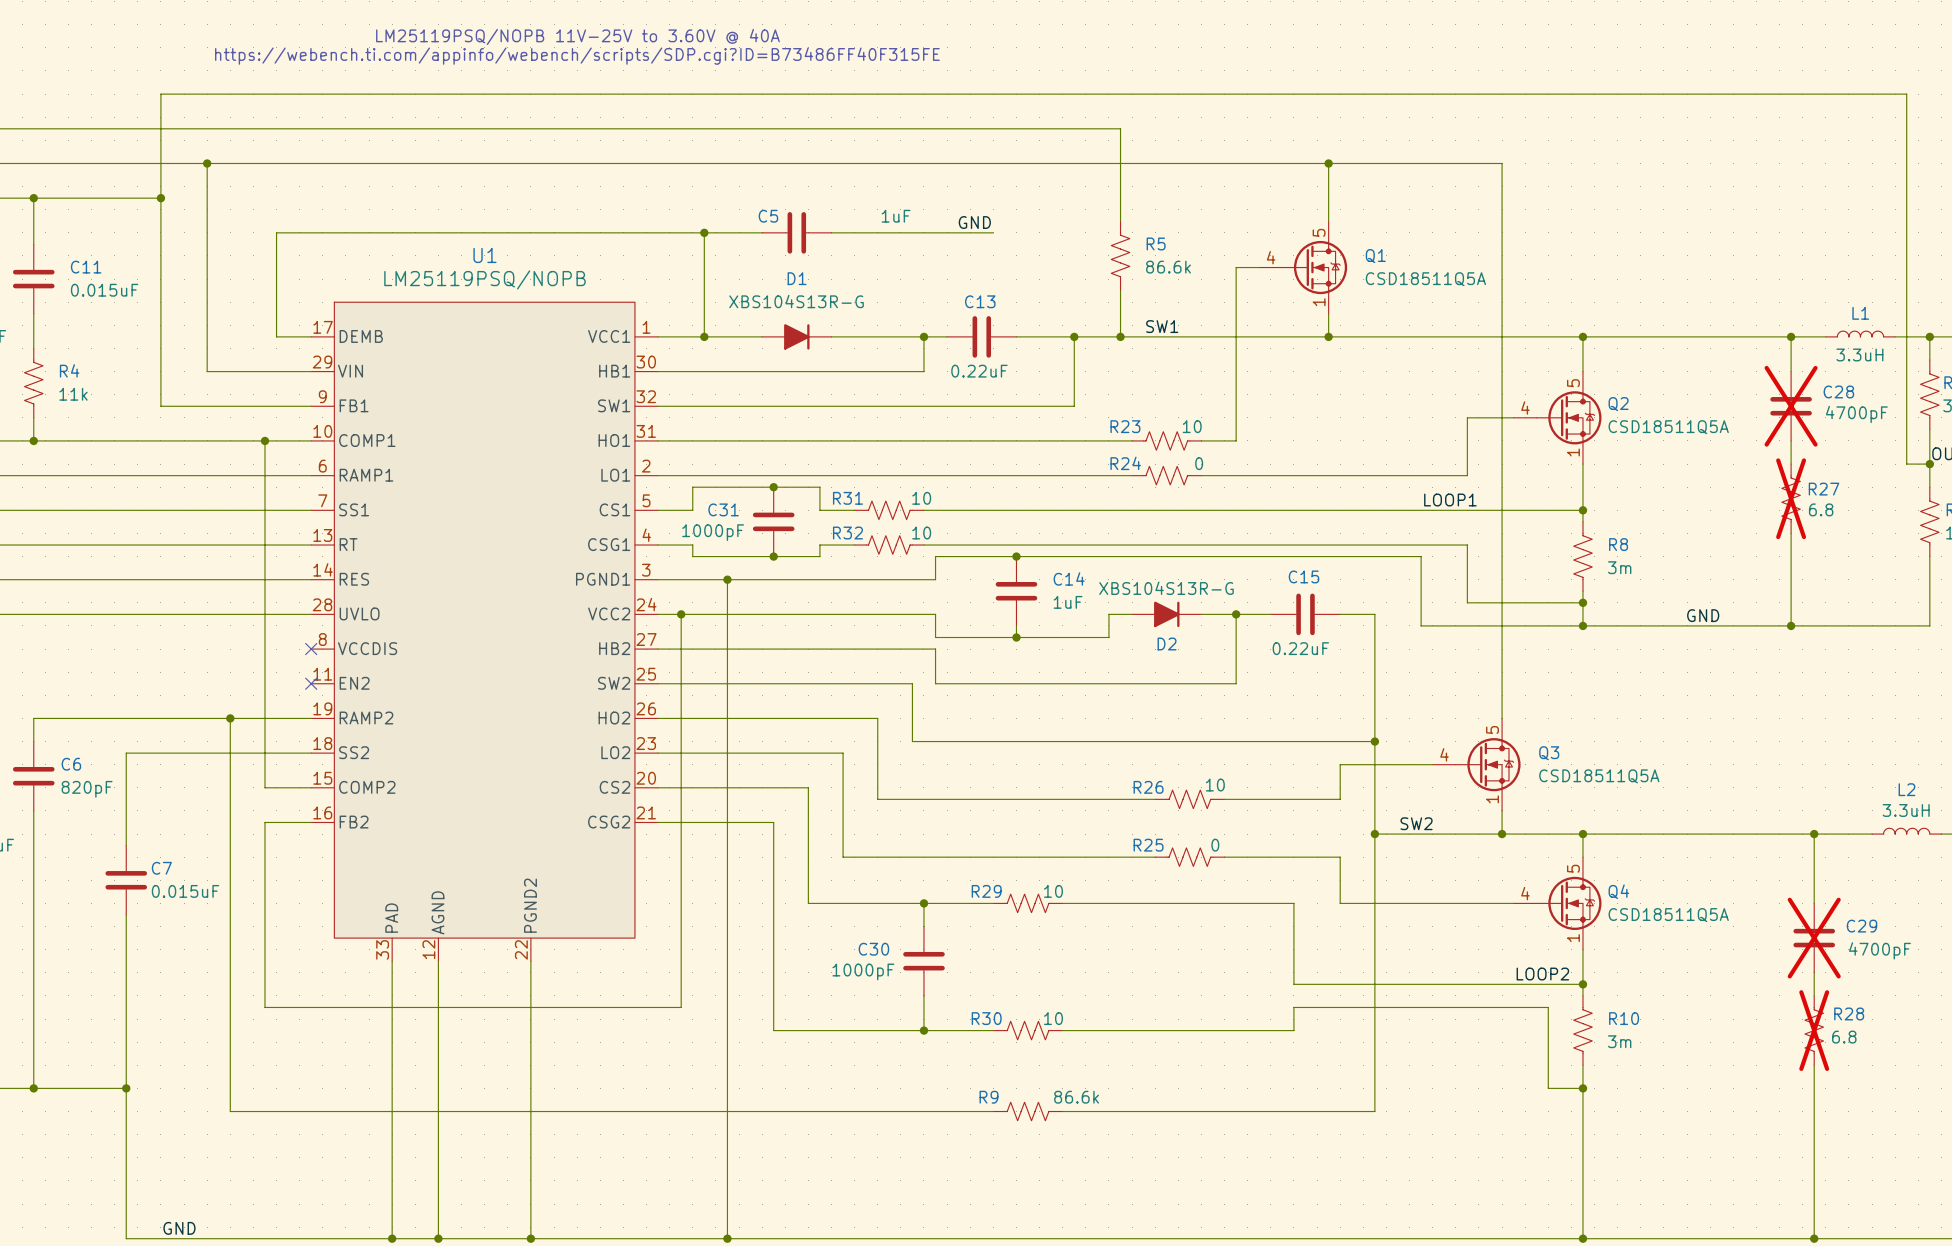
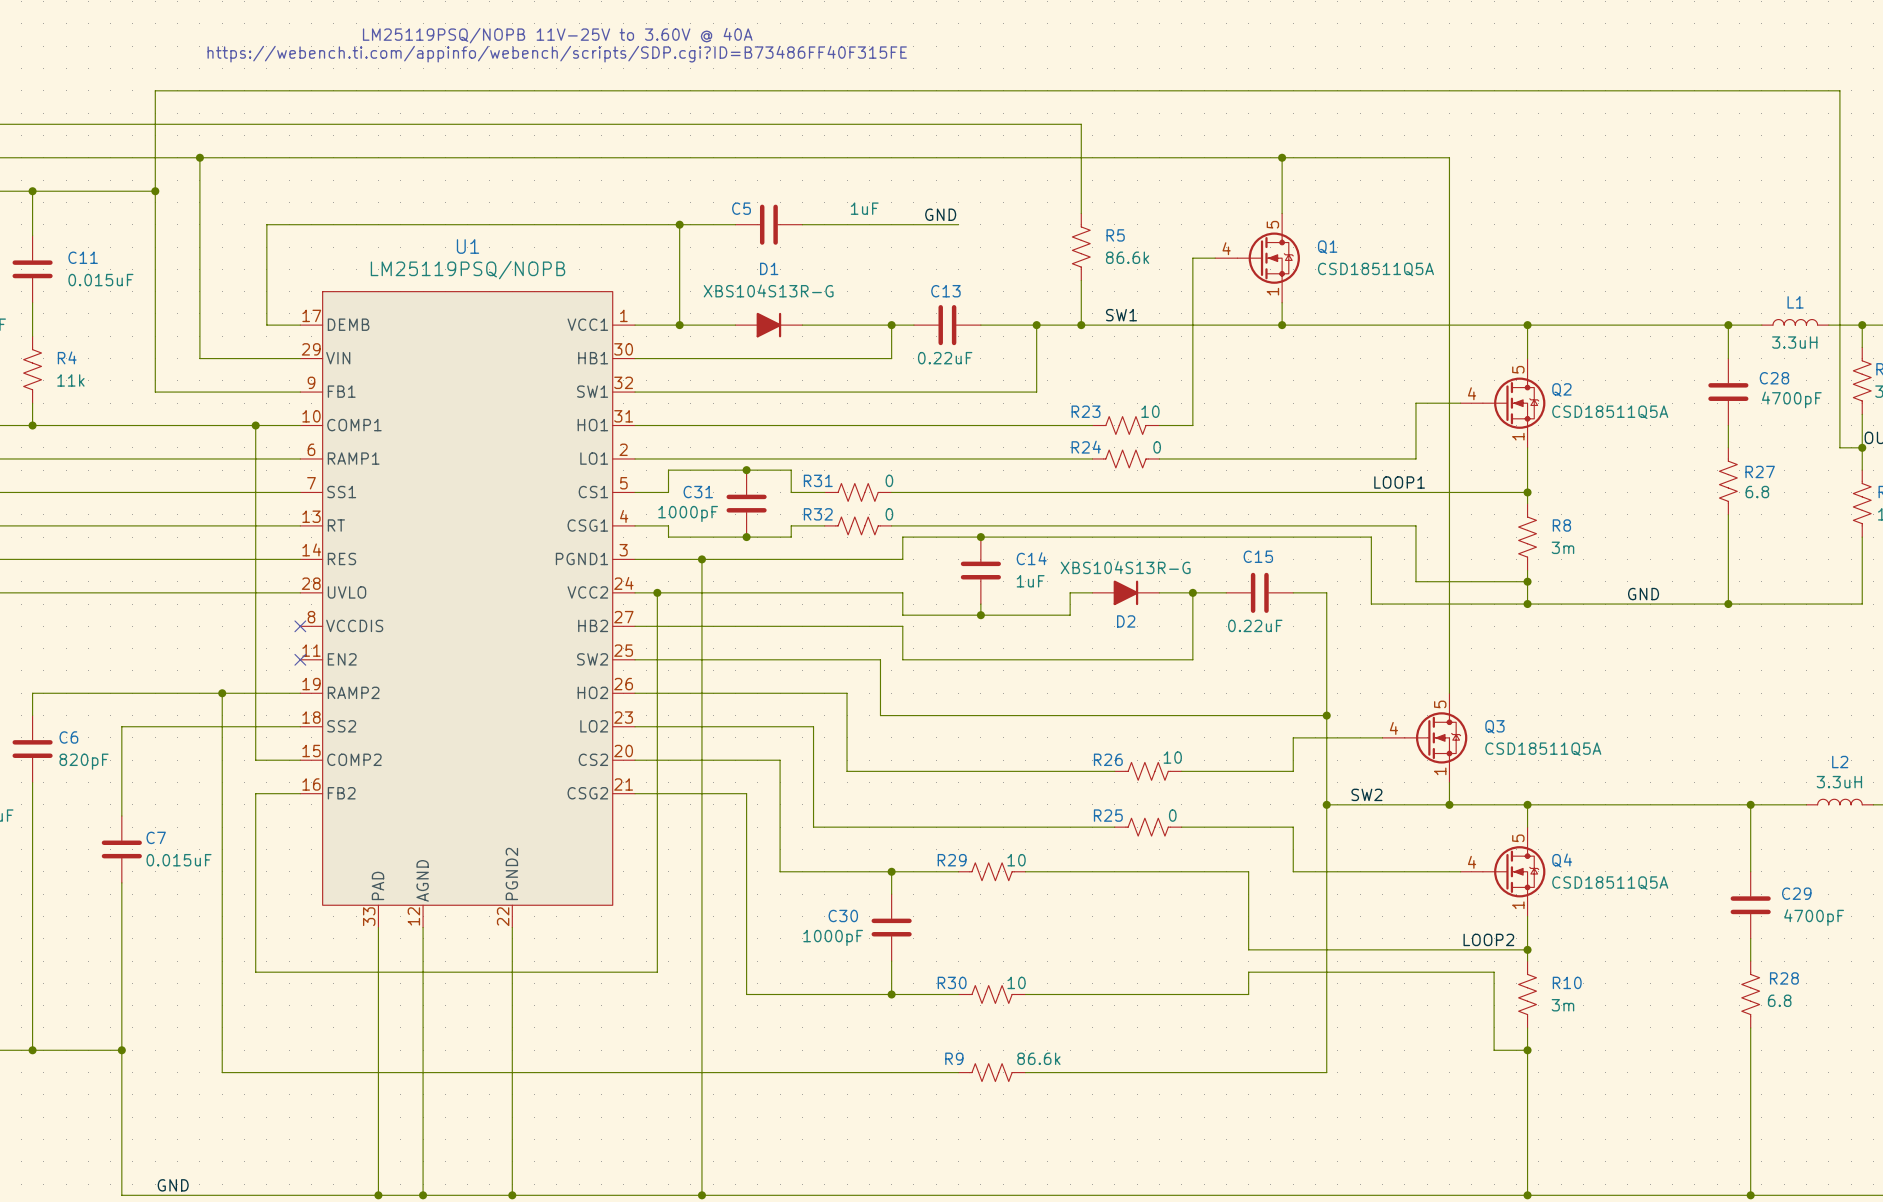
C28 do-not-place cross: (1791, 406) -> none
R31 value: 10 (921, 498) -> 0 (889, 480)
R27 do-not-place cross: (1791, 498) -> none
R32 value: 10 (921, 533) -> 0 (889, 514)
C29 do-not-place cross: (1814, 938) -> none
R28 do-not-place cross: (1814, 1030) -> none

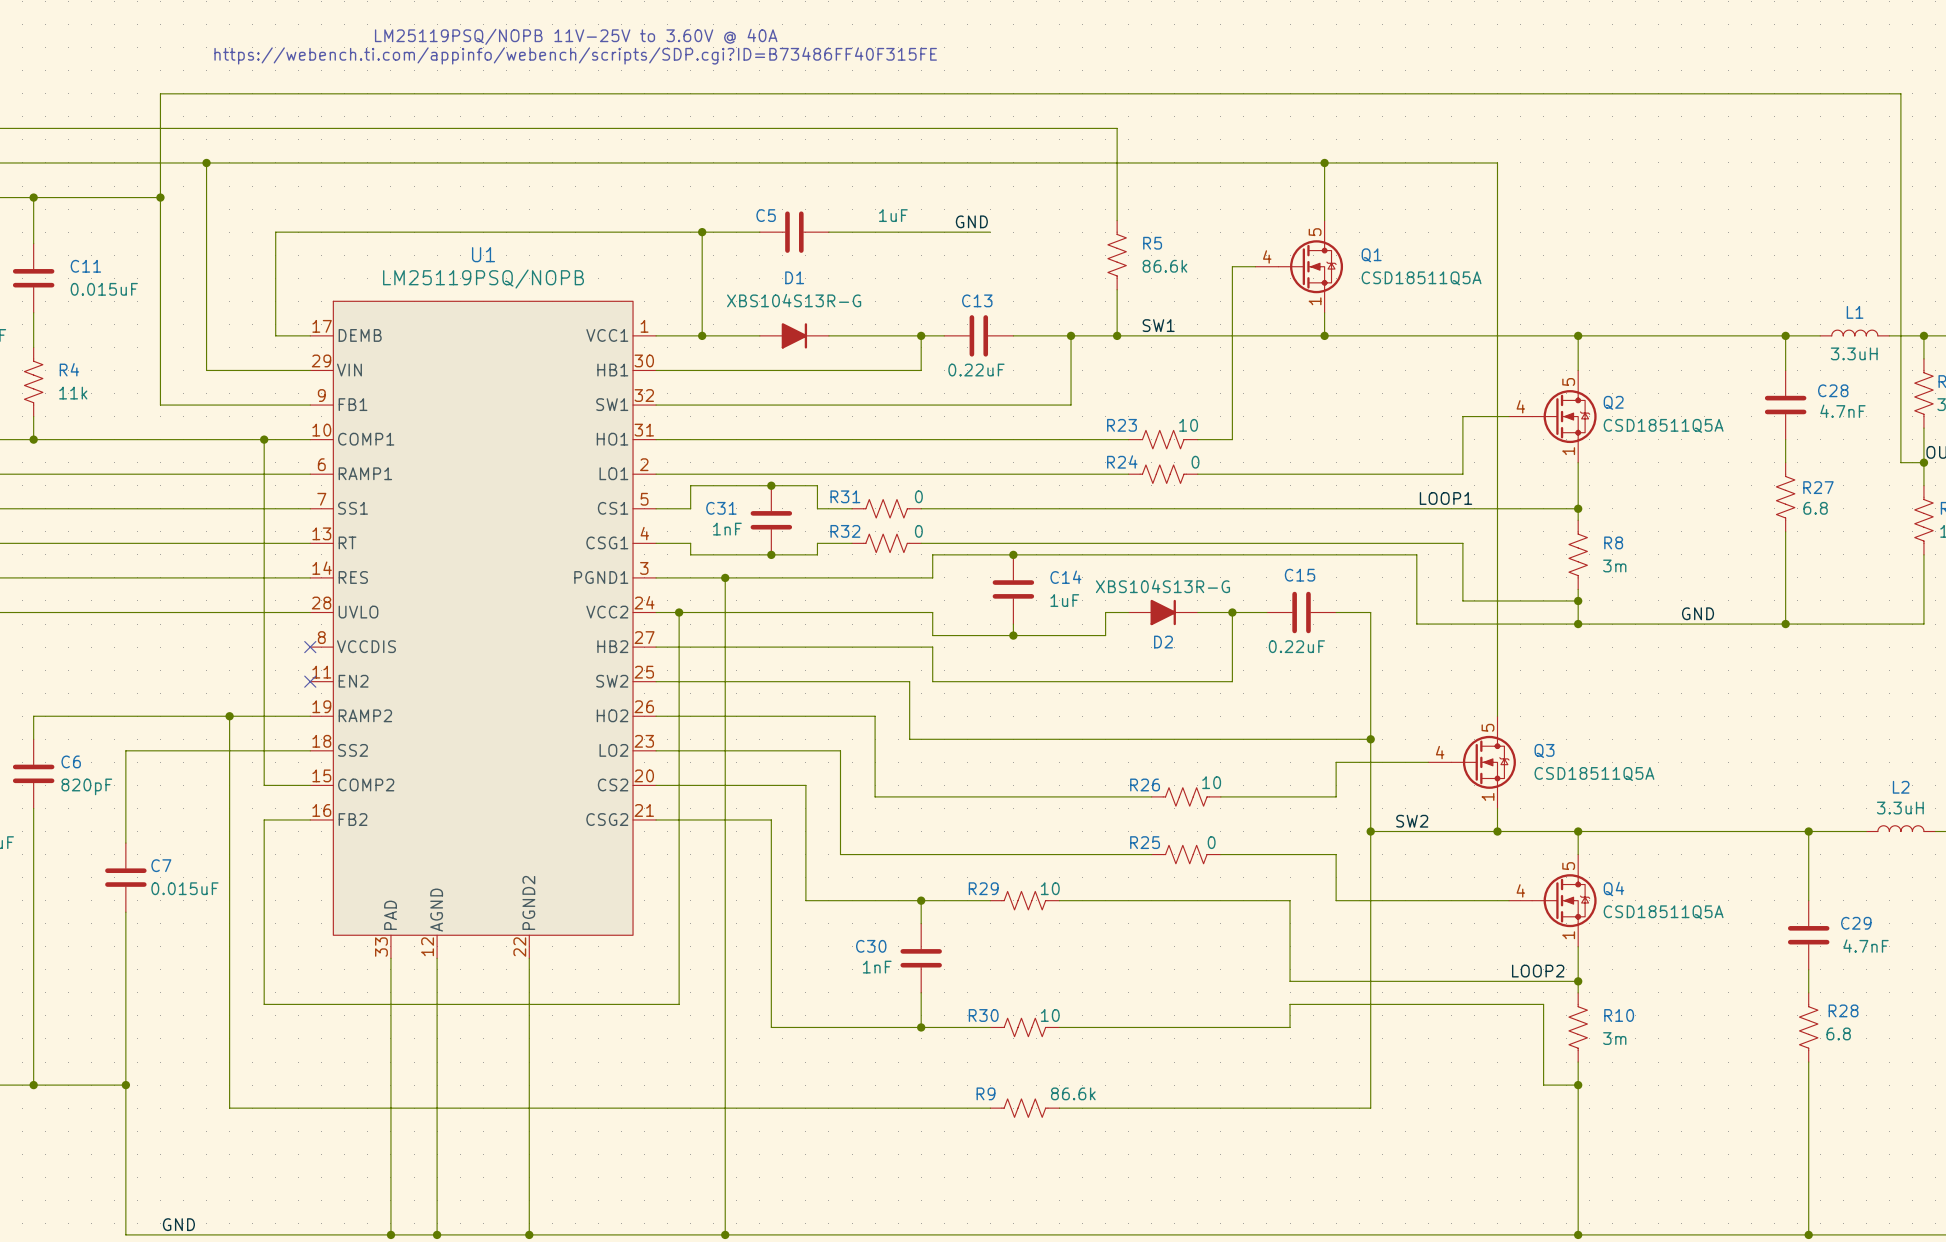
C28 value: 4700pF (1791, 399) -> 4.7nF (1842, 411)
C31 value: 1000pF (688, 513) -> 1nF (727, 529)
C29 value: 4700pF (1814, 917) -> 4.7nF (1866, 946)
C30 value: 1000pF (833, 937) -> 1nF (877, 967)

